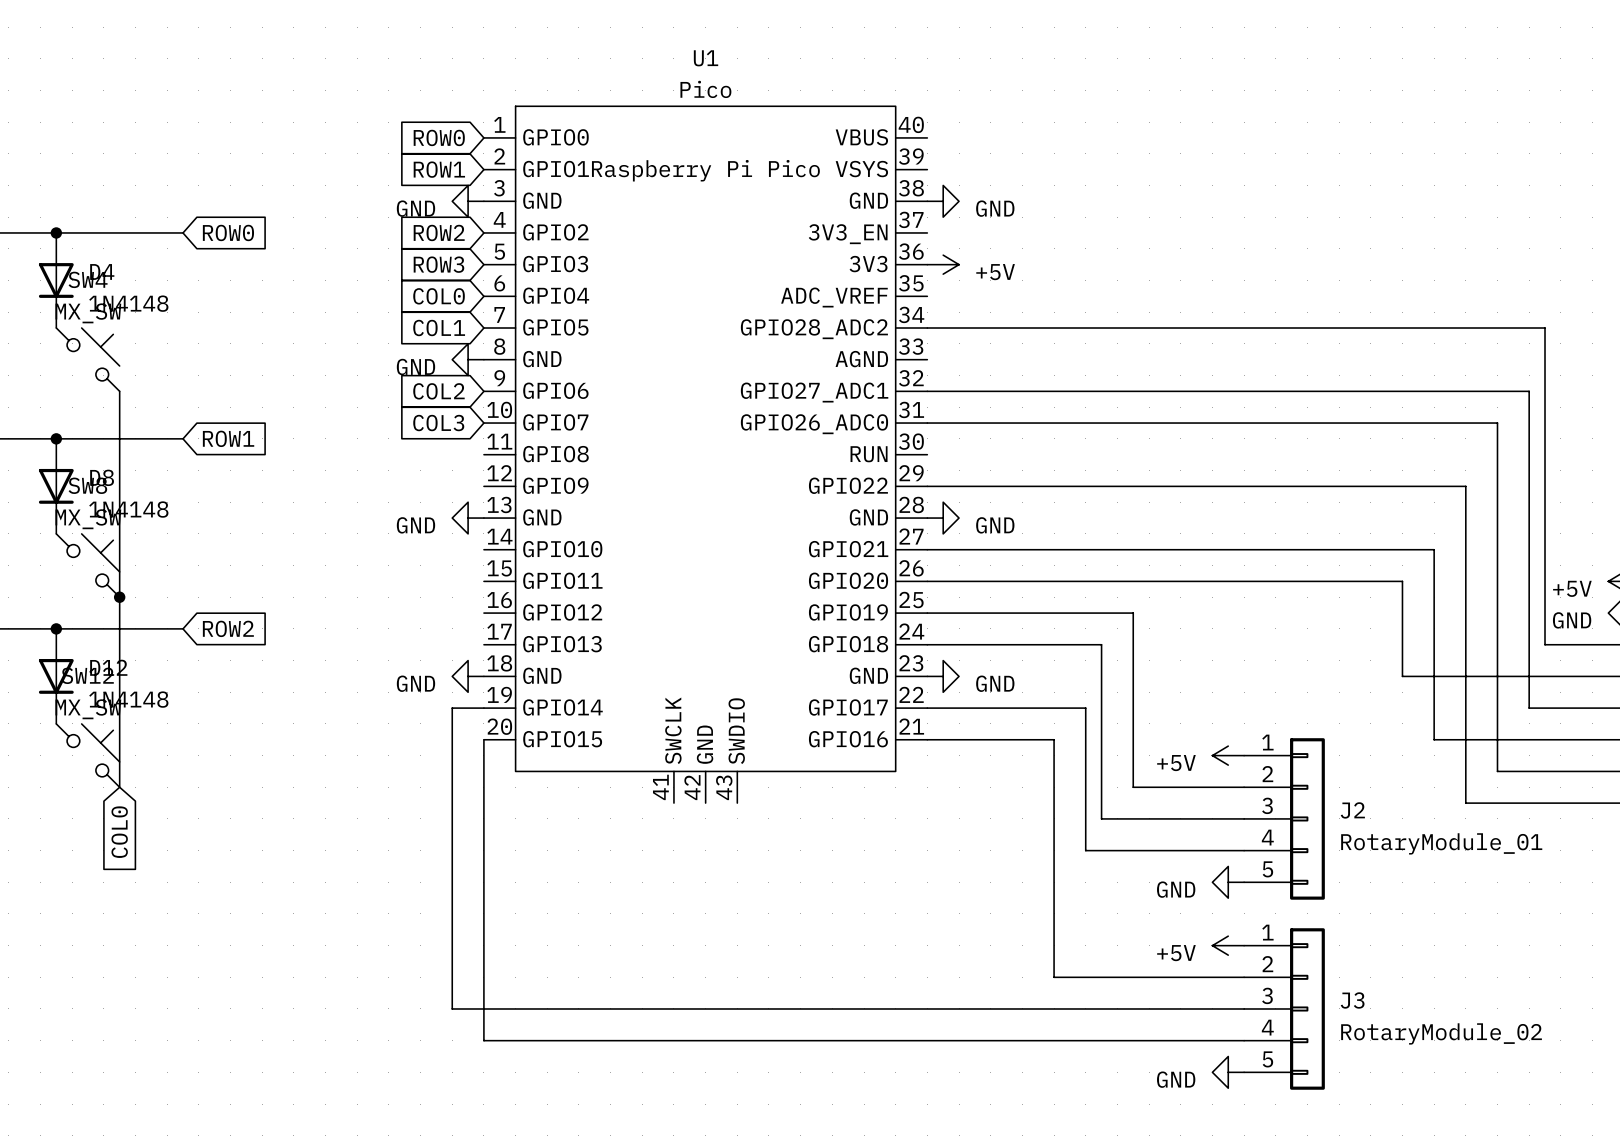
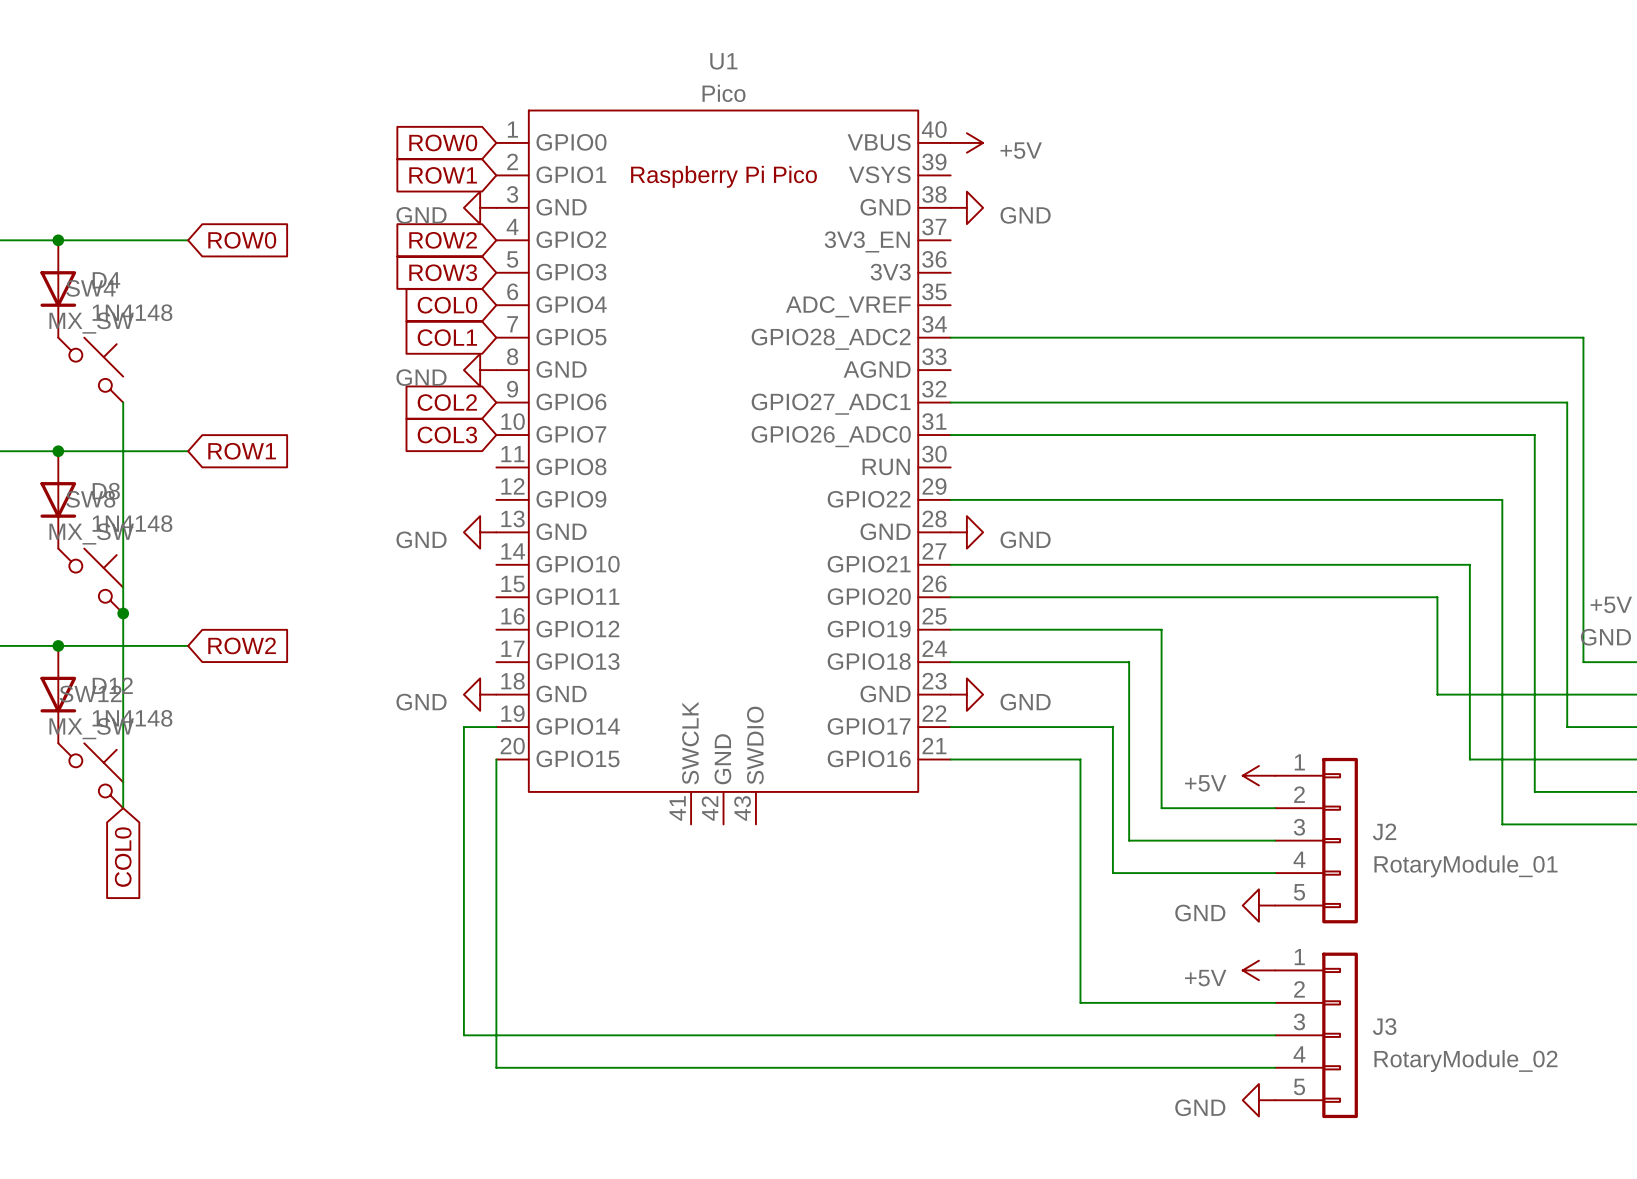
power symbol position: +5V (943, 264) -> +5V (966, 142)

